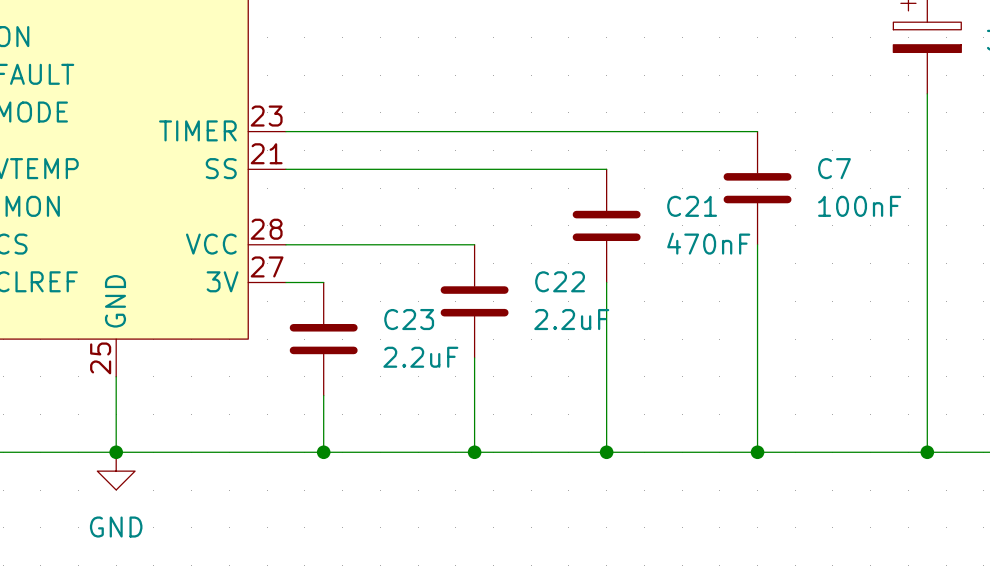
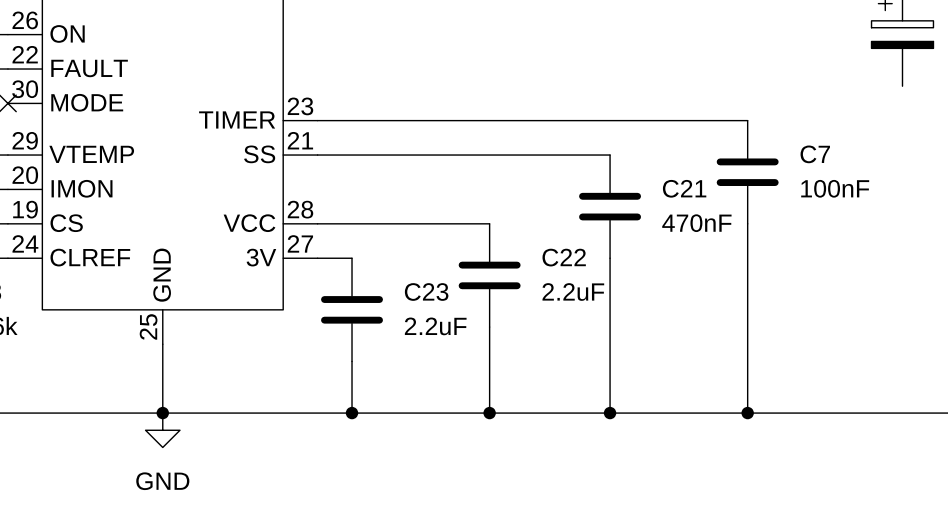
wire: (927, 93) (927, 452) -> none
junction: (927, 452) -> none

